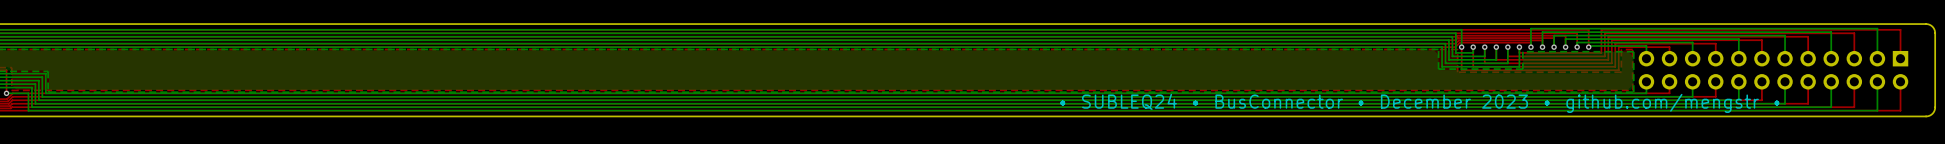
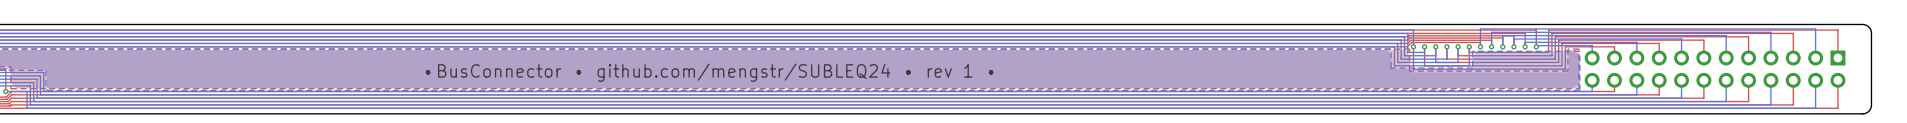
text: none -> •BusConnector • github.com/mengstr/SUBLEQ24 • rev 1 • (709, 72)
text: • SUBLEQ24 • BusConnector • December 2023 • github.com/mengstr • (1419, 103) -> none

